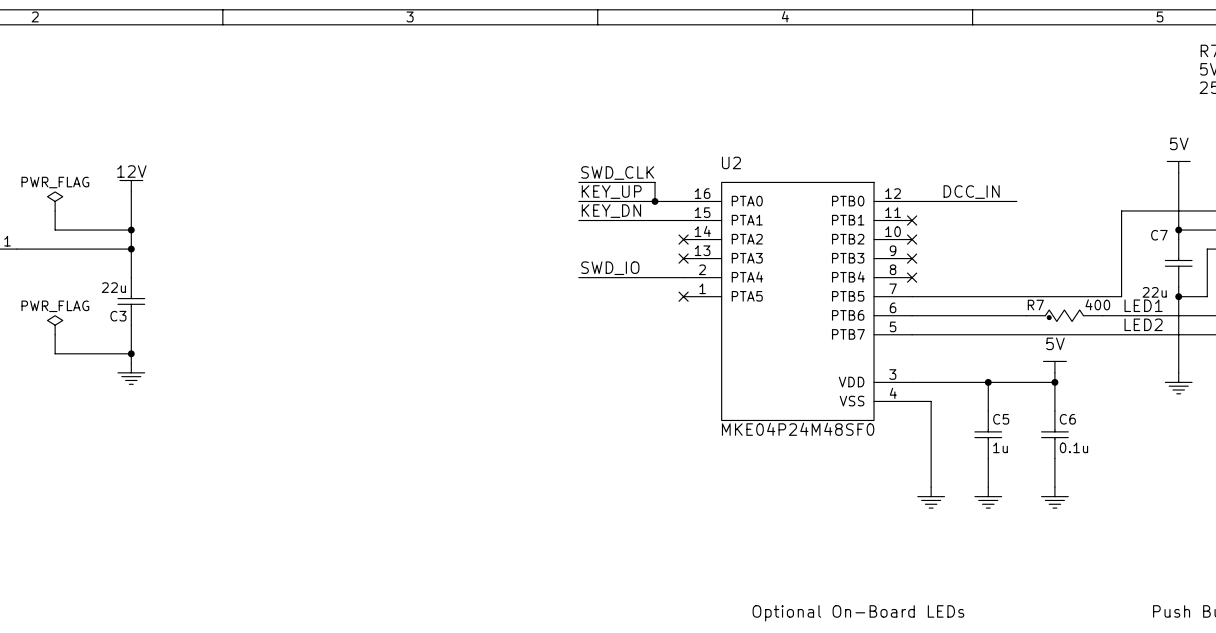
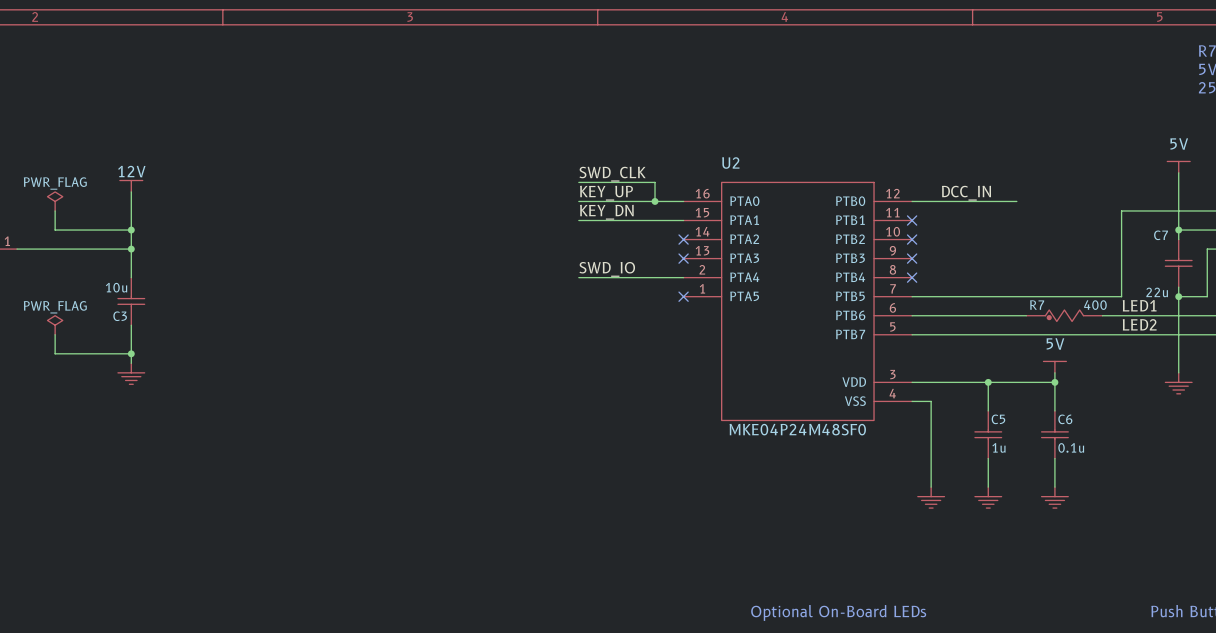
C3 value: 22u (113, 287) -> 10u (116, 287)

